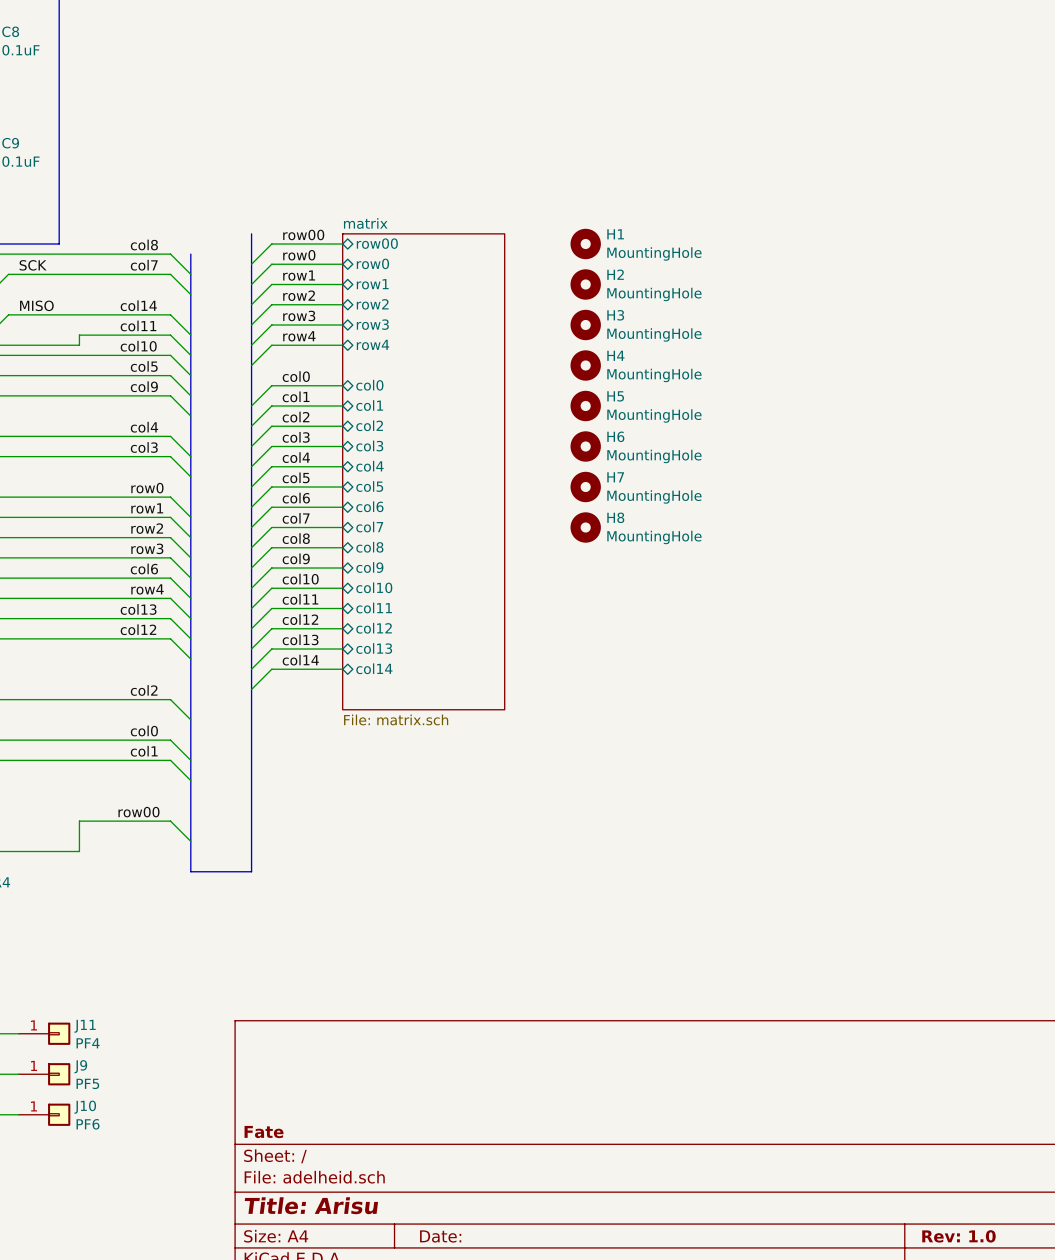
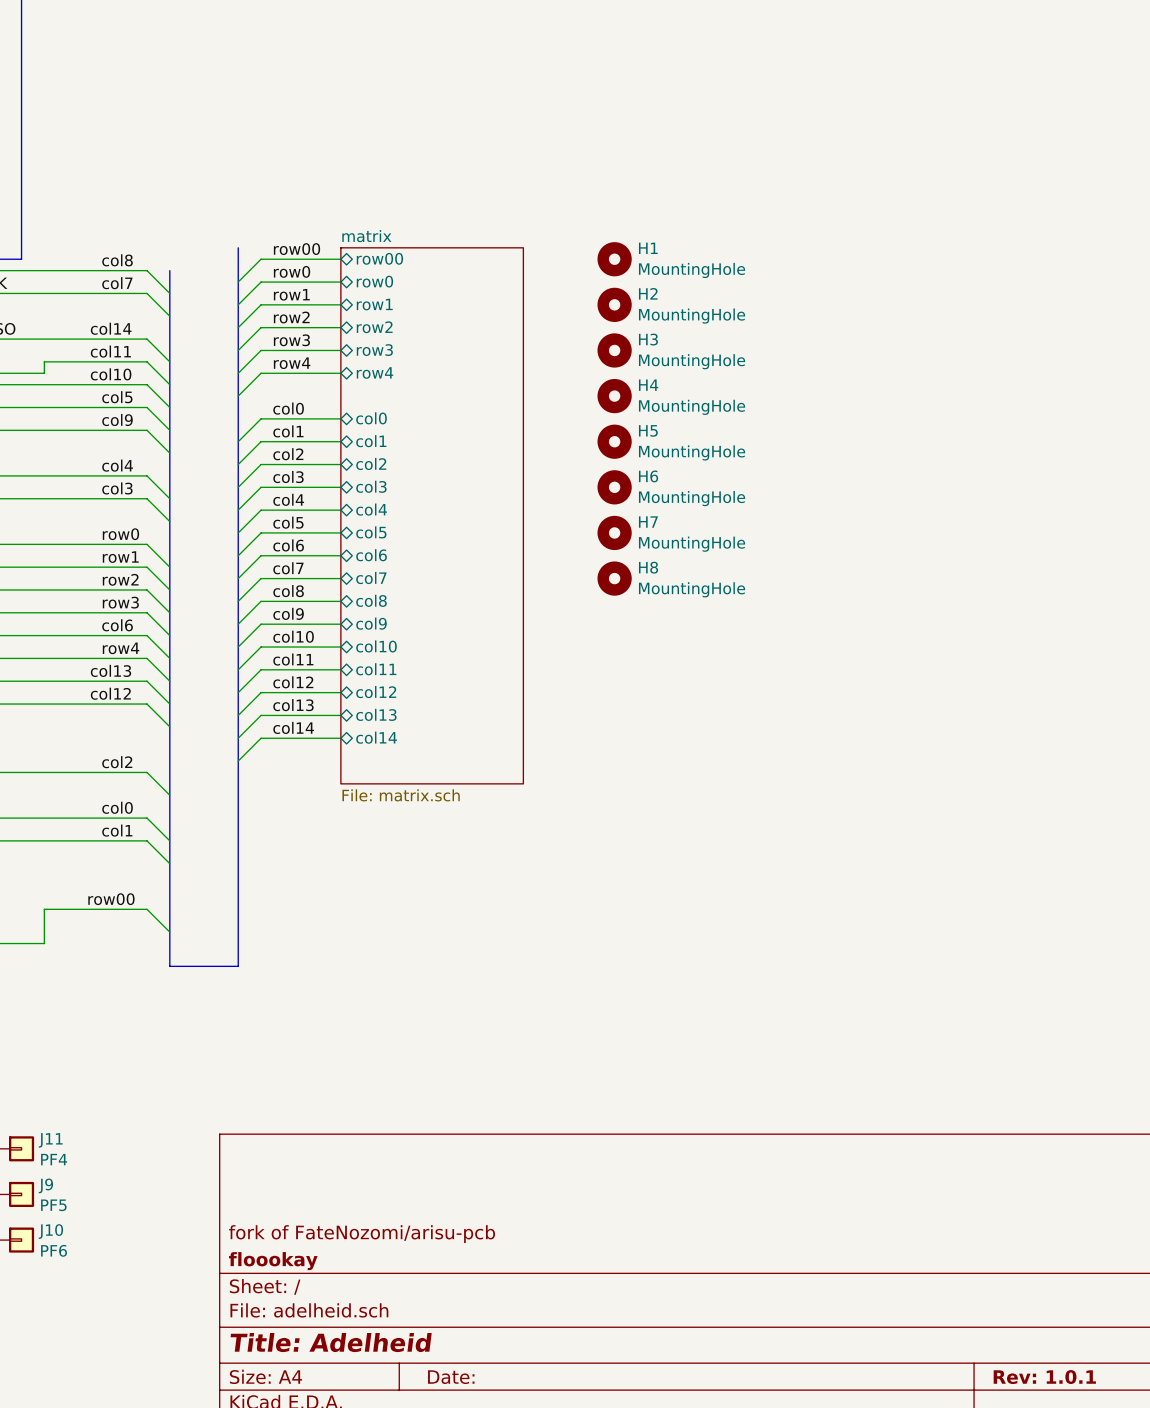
title block: none -> fork of FateNozomi/arisu-pcb (362, 1234)
title block: Fate (264, 1132) -> floookay (273, 1261)
title block: Title: Arisu (311, 1205) -> Title: Adelheid (331, 1342)
title block: Rev: 1.0 (958, 1236) -> Rev: 1.0.1 (1044, 1377)

